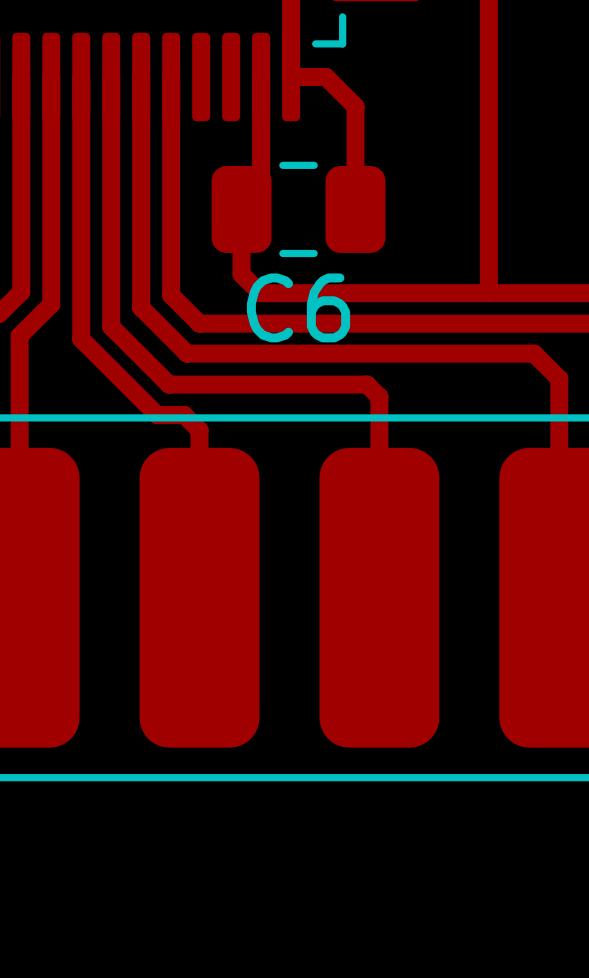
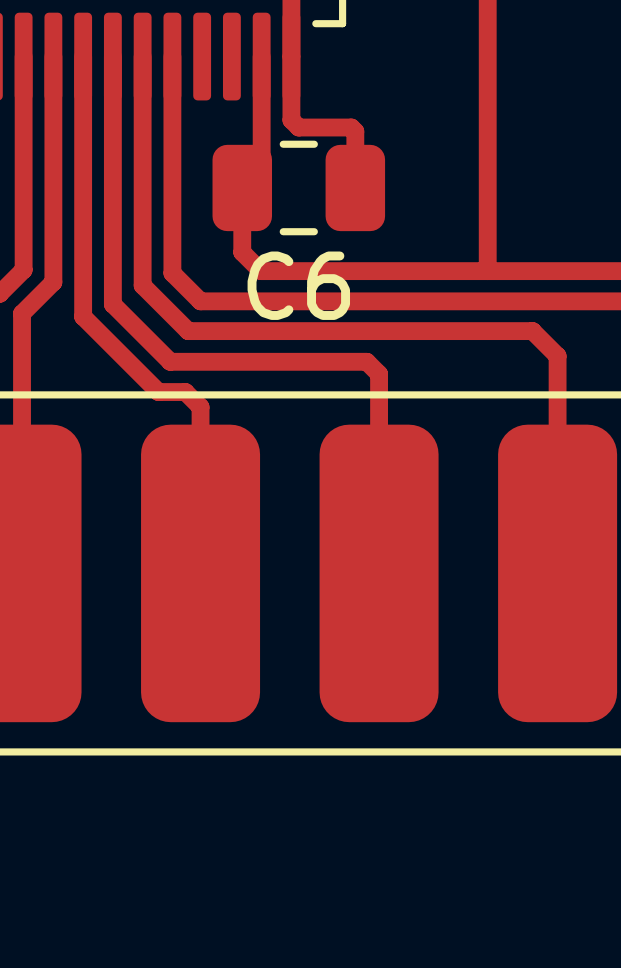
track: (291, 77) (326, 77) (355, 106) (355, 152) -> (291, 56) (291, 120) (298, 127) (351, 127) (355, 131)

